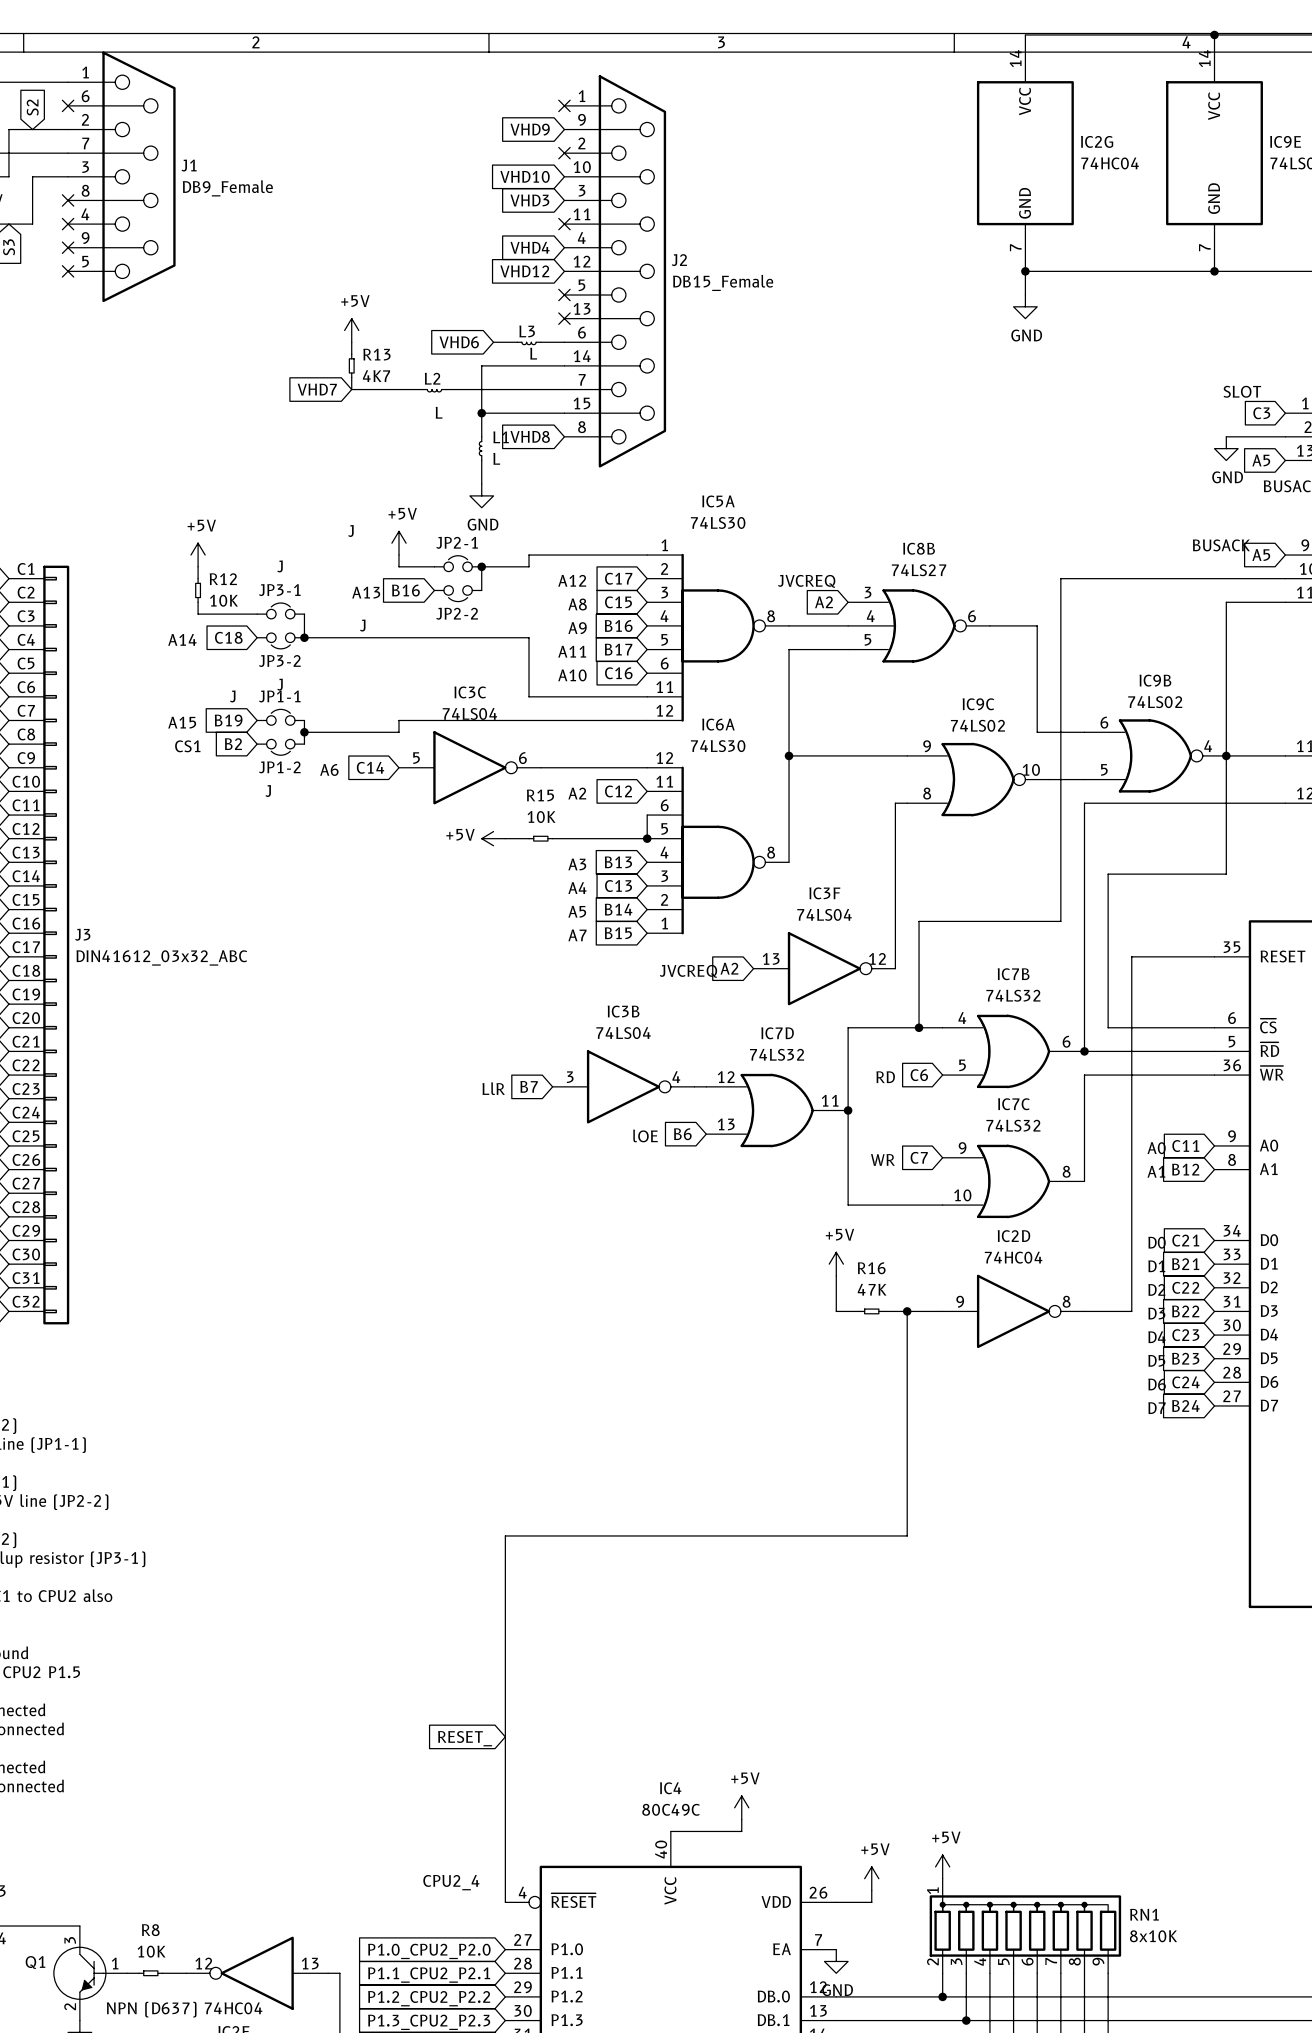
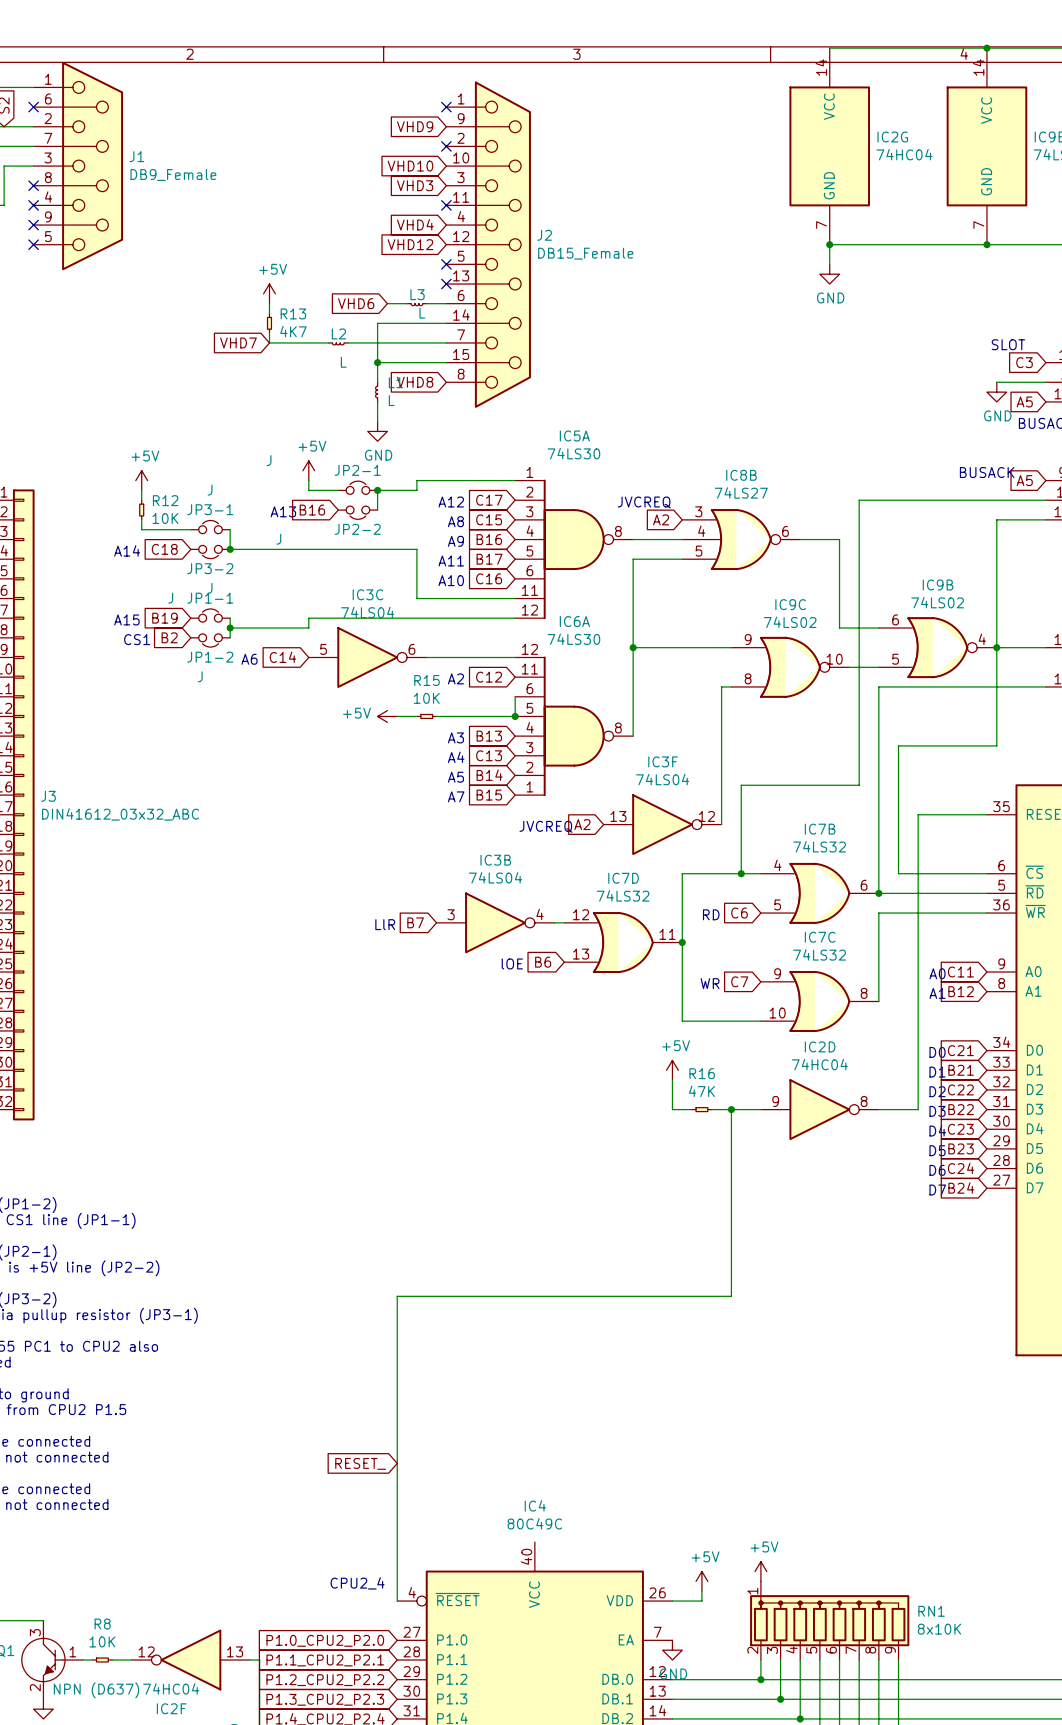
power symbol: +5V (741, 1807) -> none
wire: (741, 1819) (741, 1831) (670, 1831) -> none

